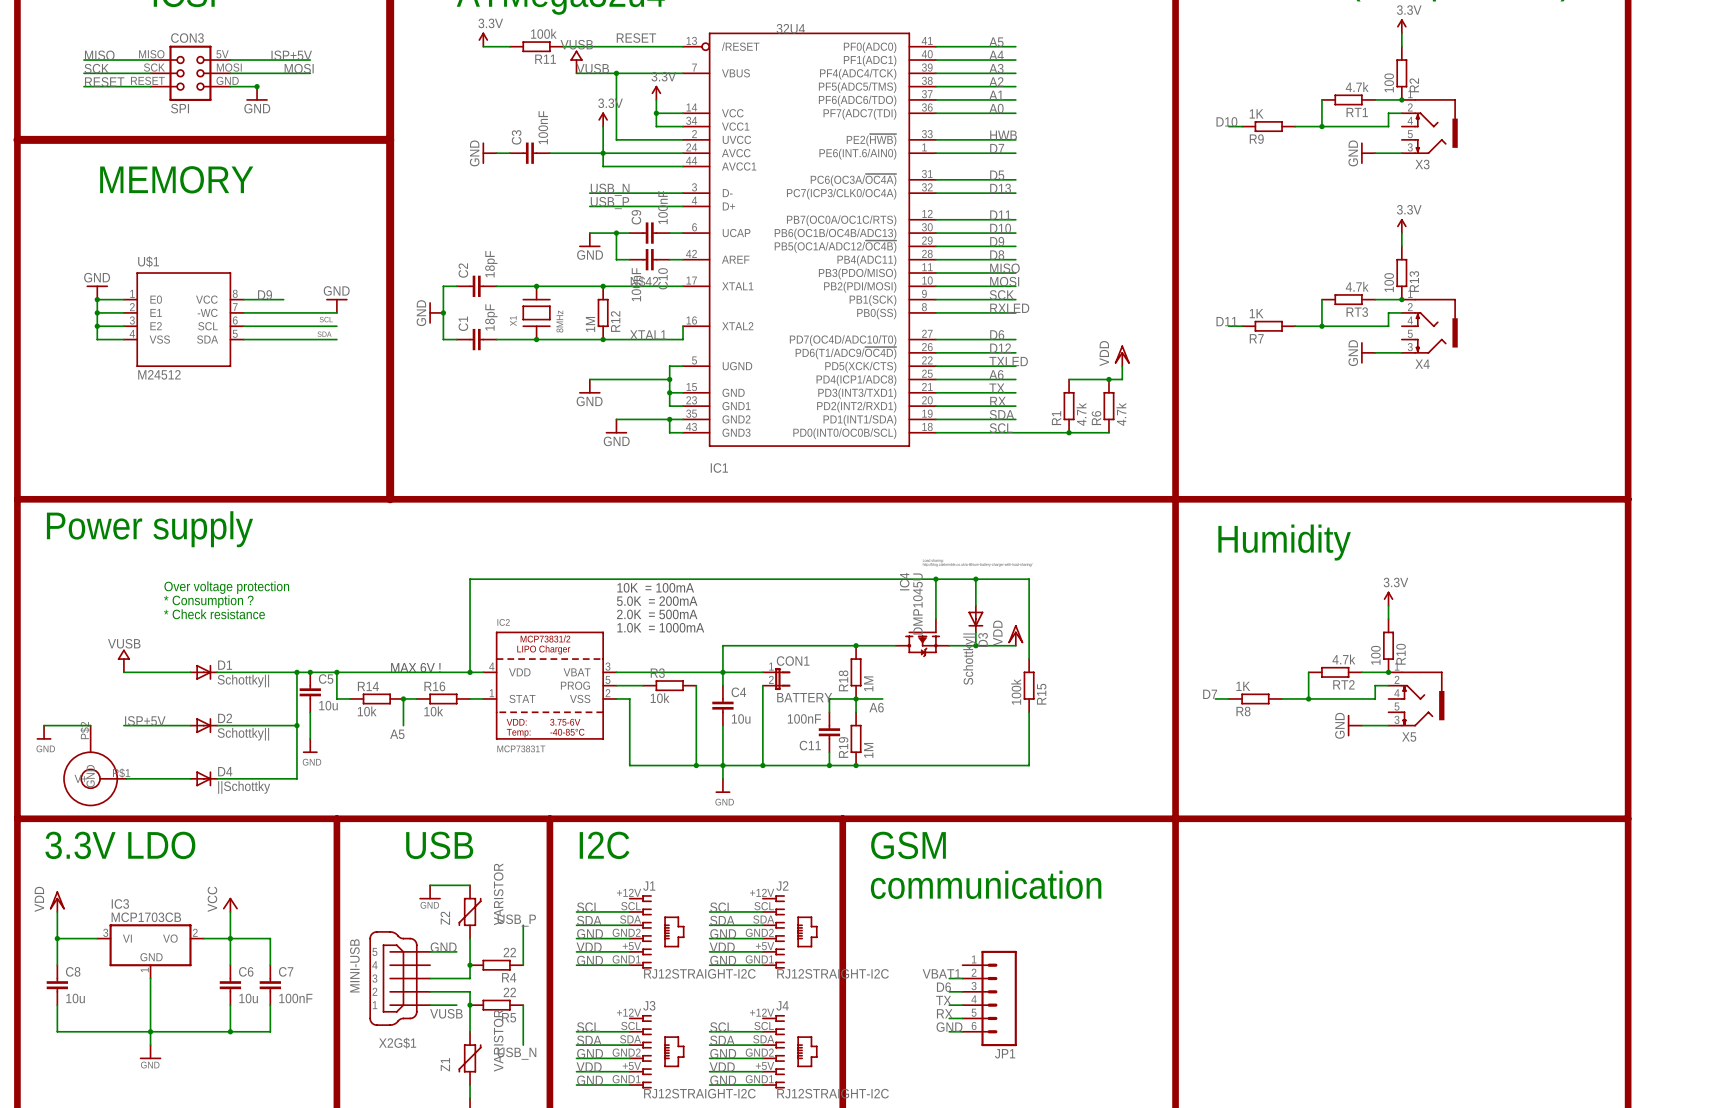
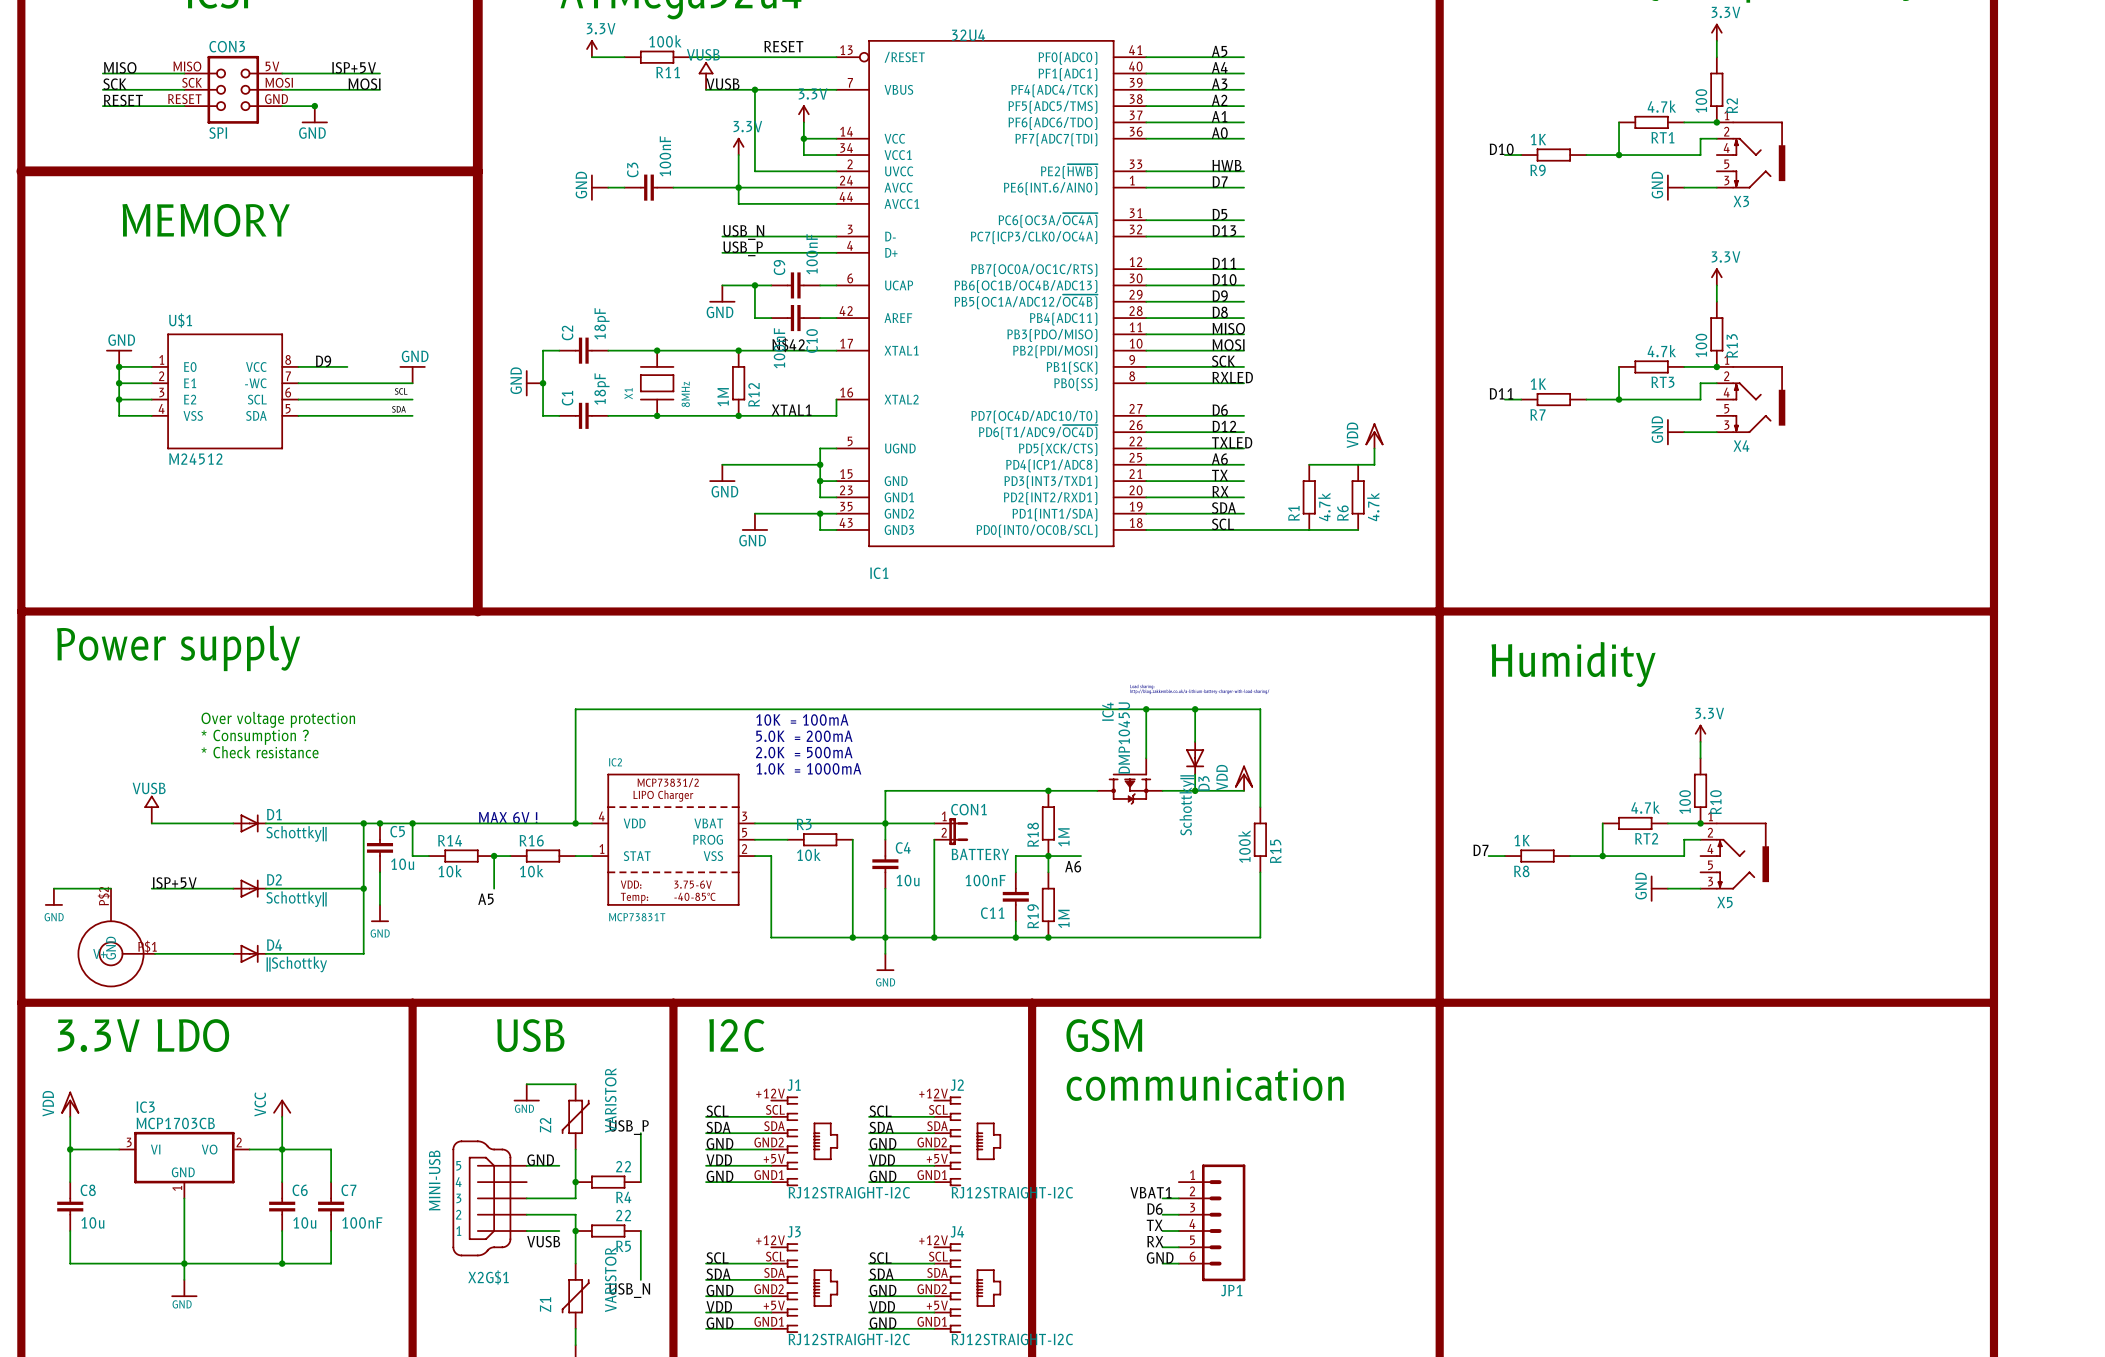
junction: (1108, 379) -> none
junction: (1069, 432) -> none

